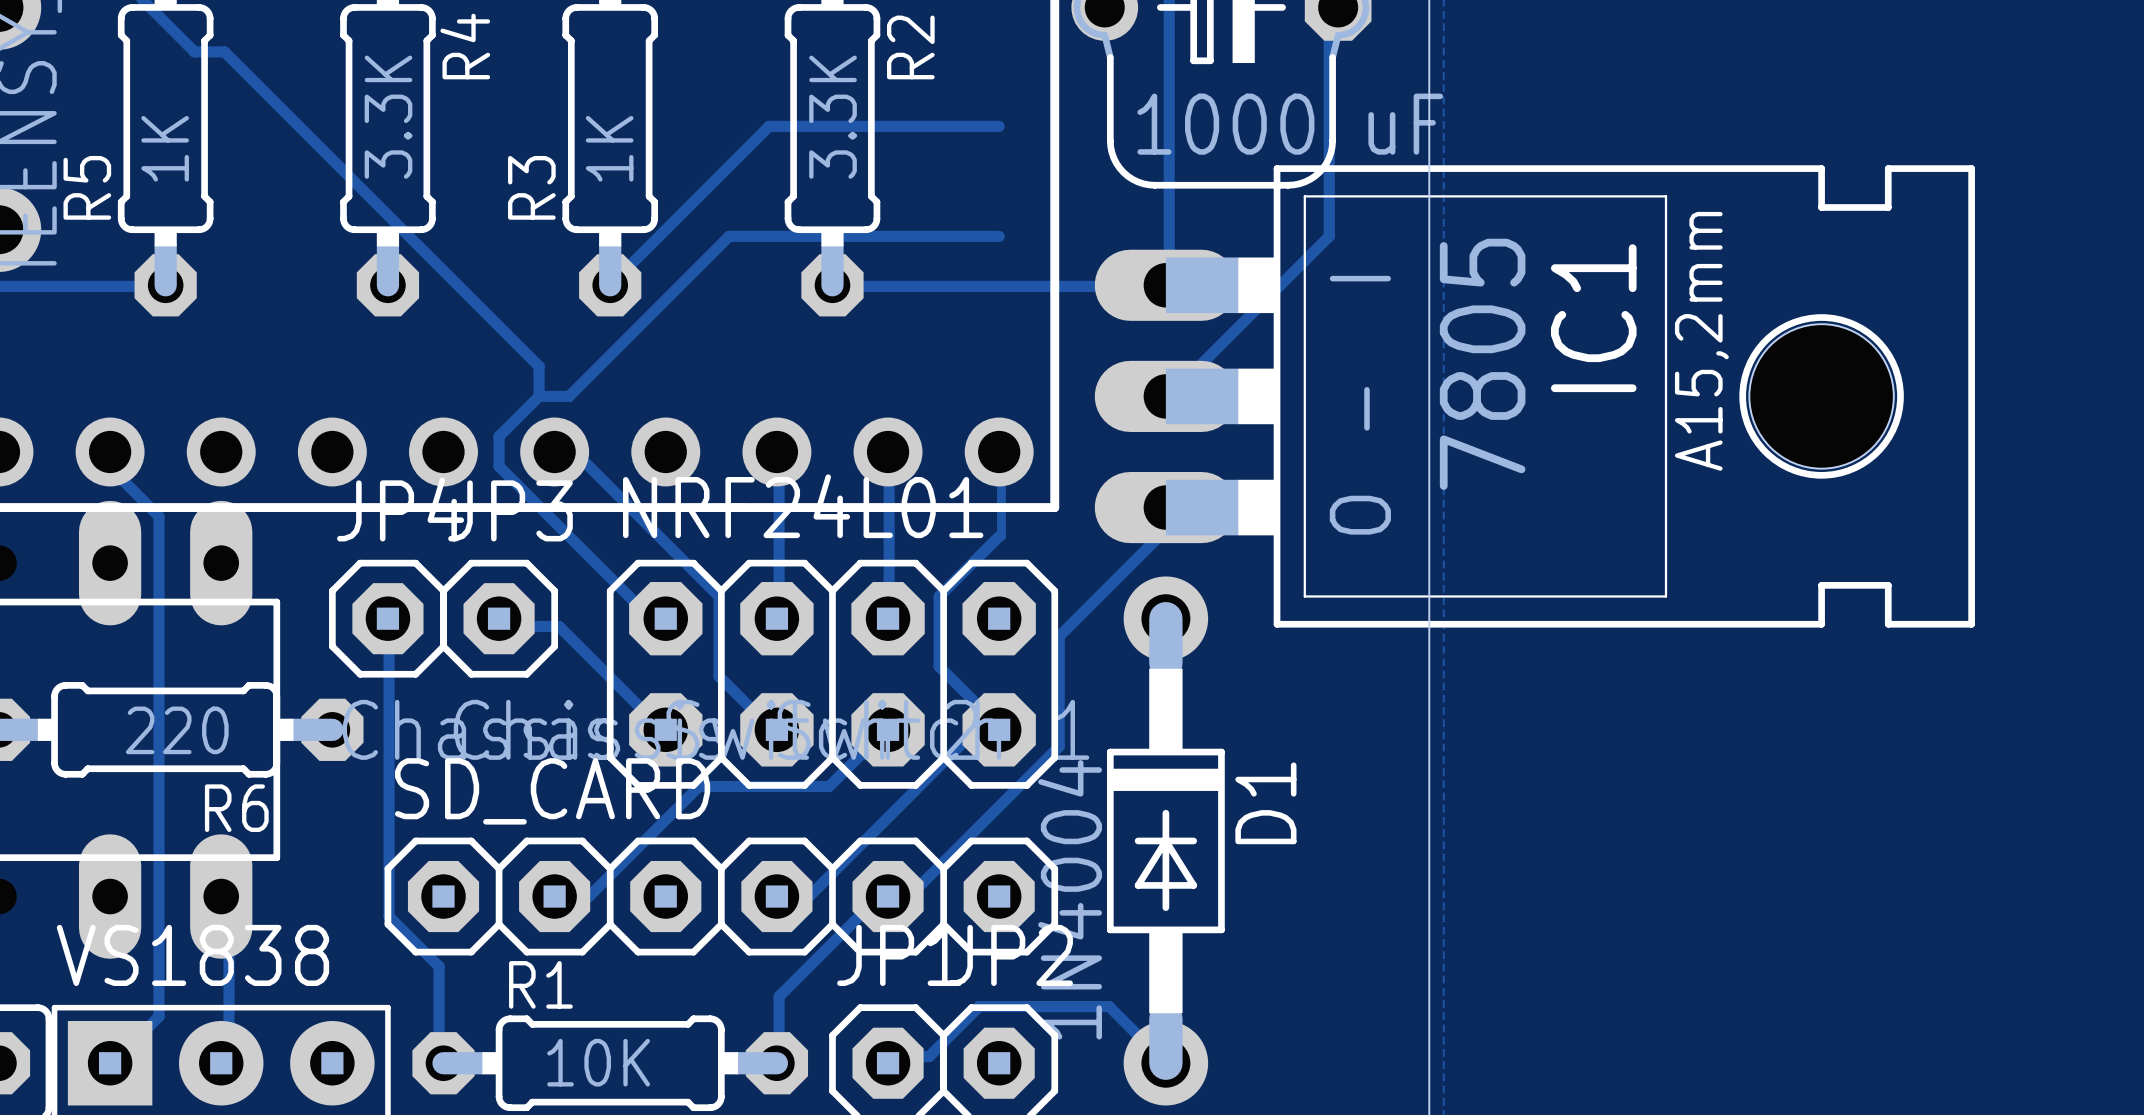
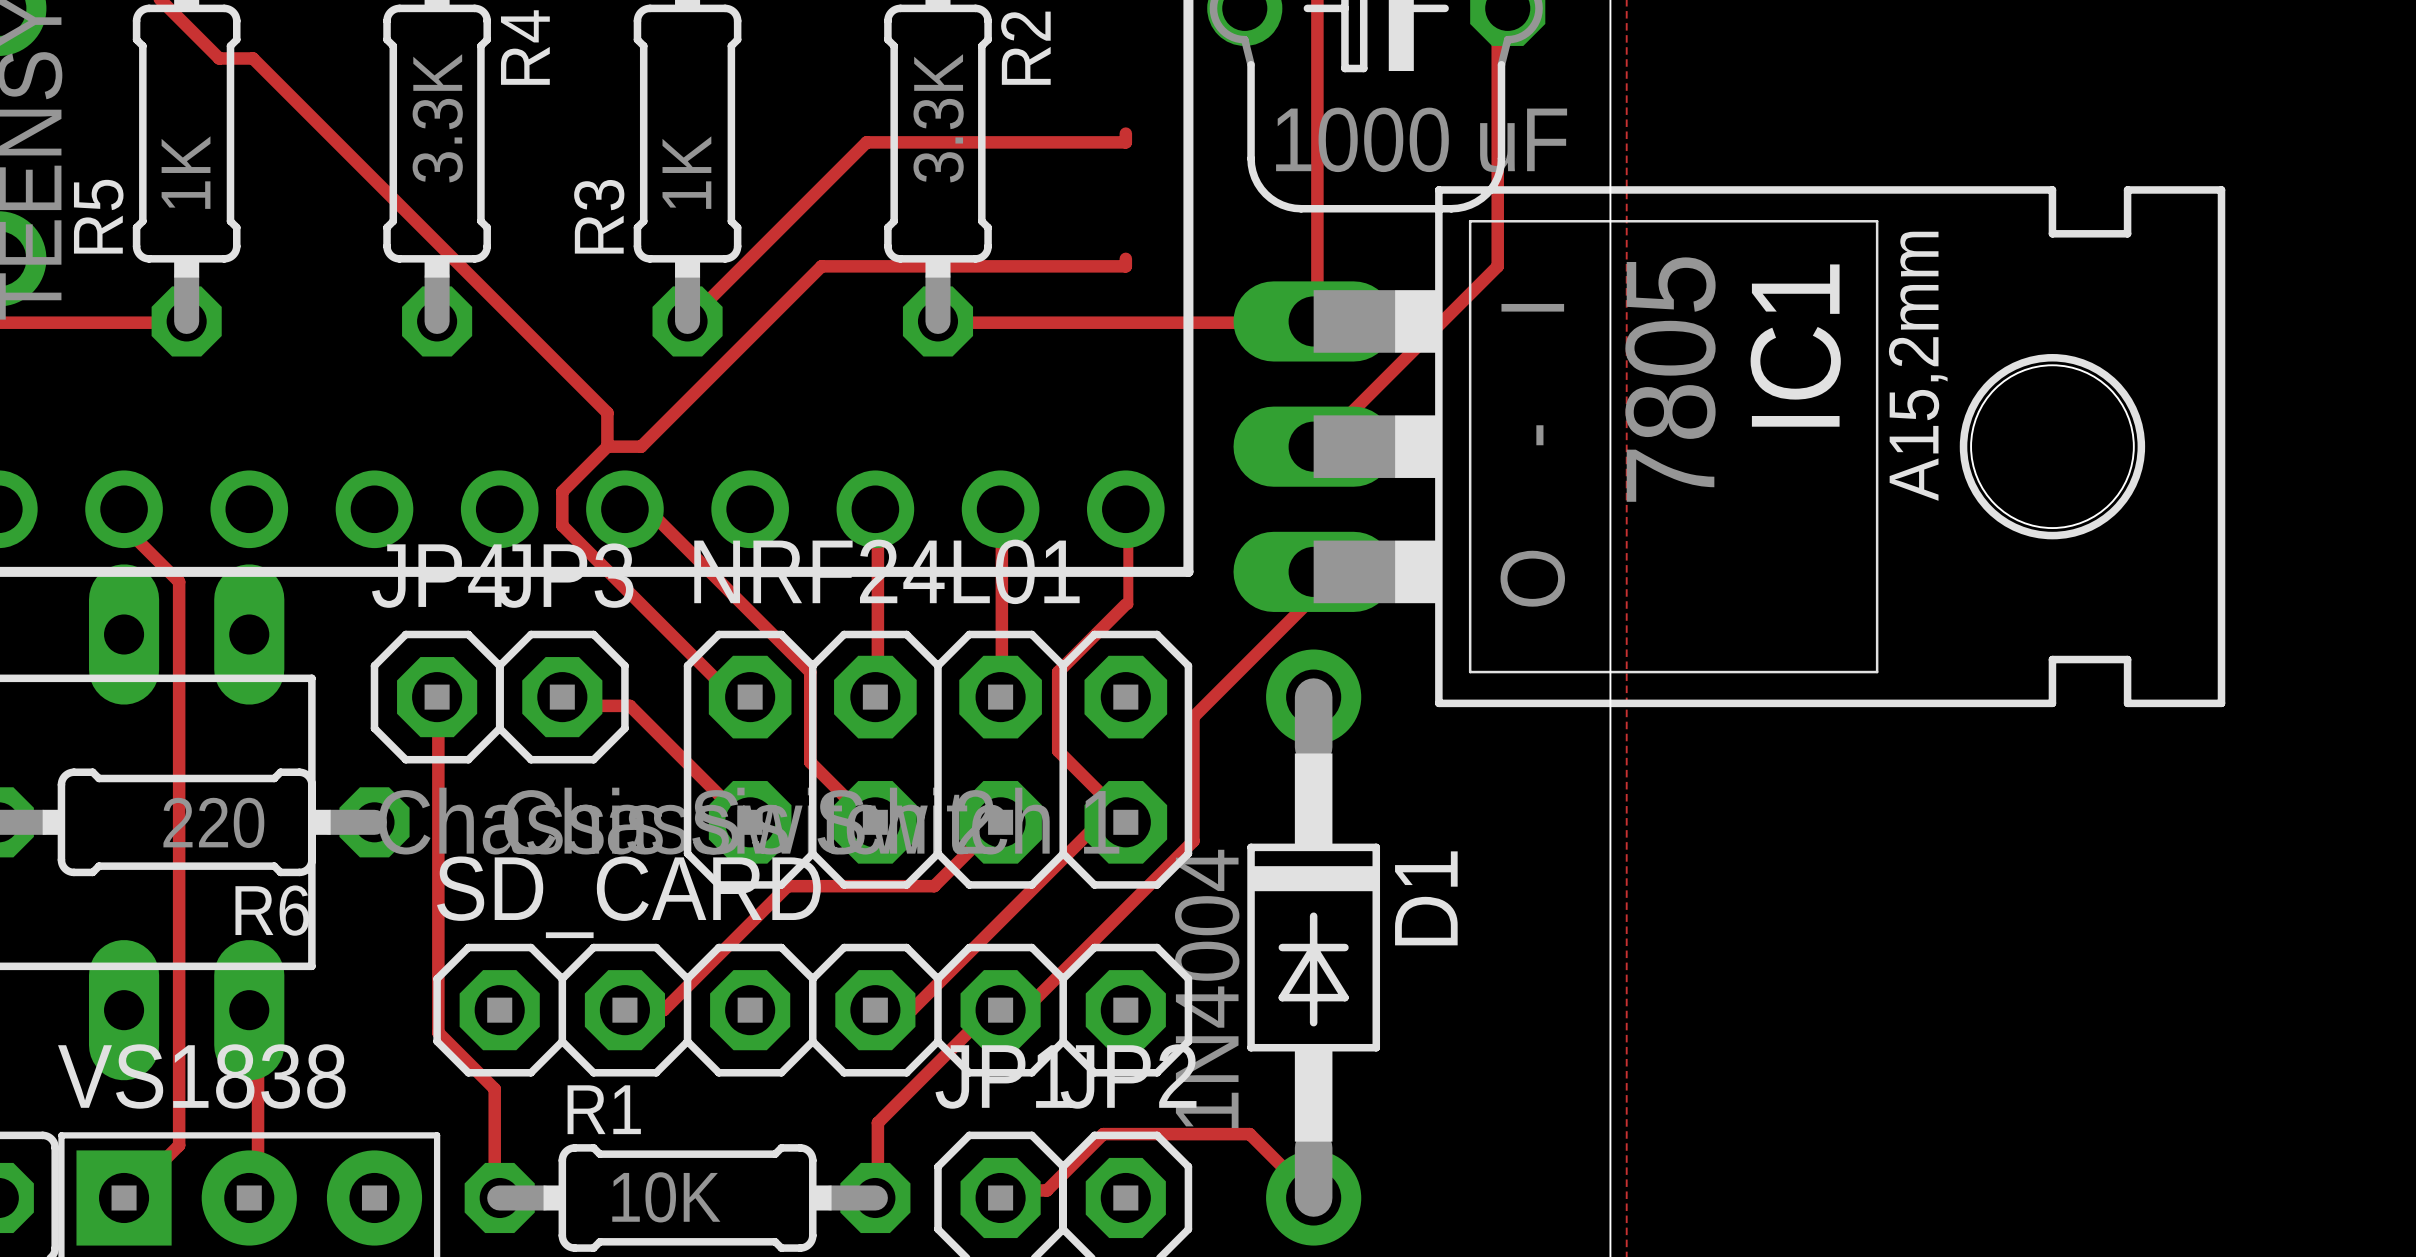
track: none -> (1125, 133) (1125, 142)
track: none -> (1125, 258) (1125, 266)

